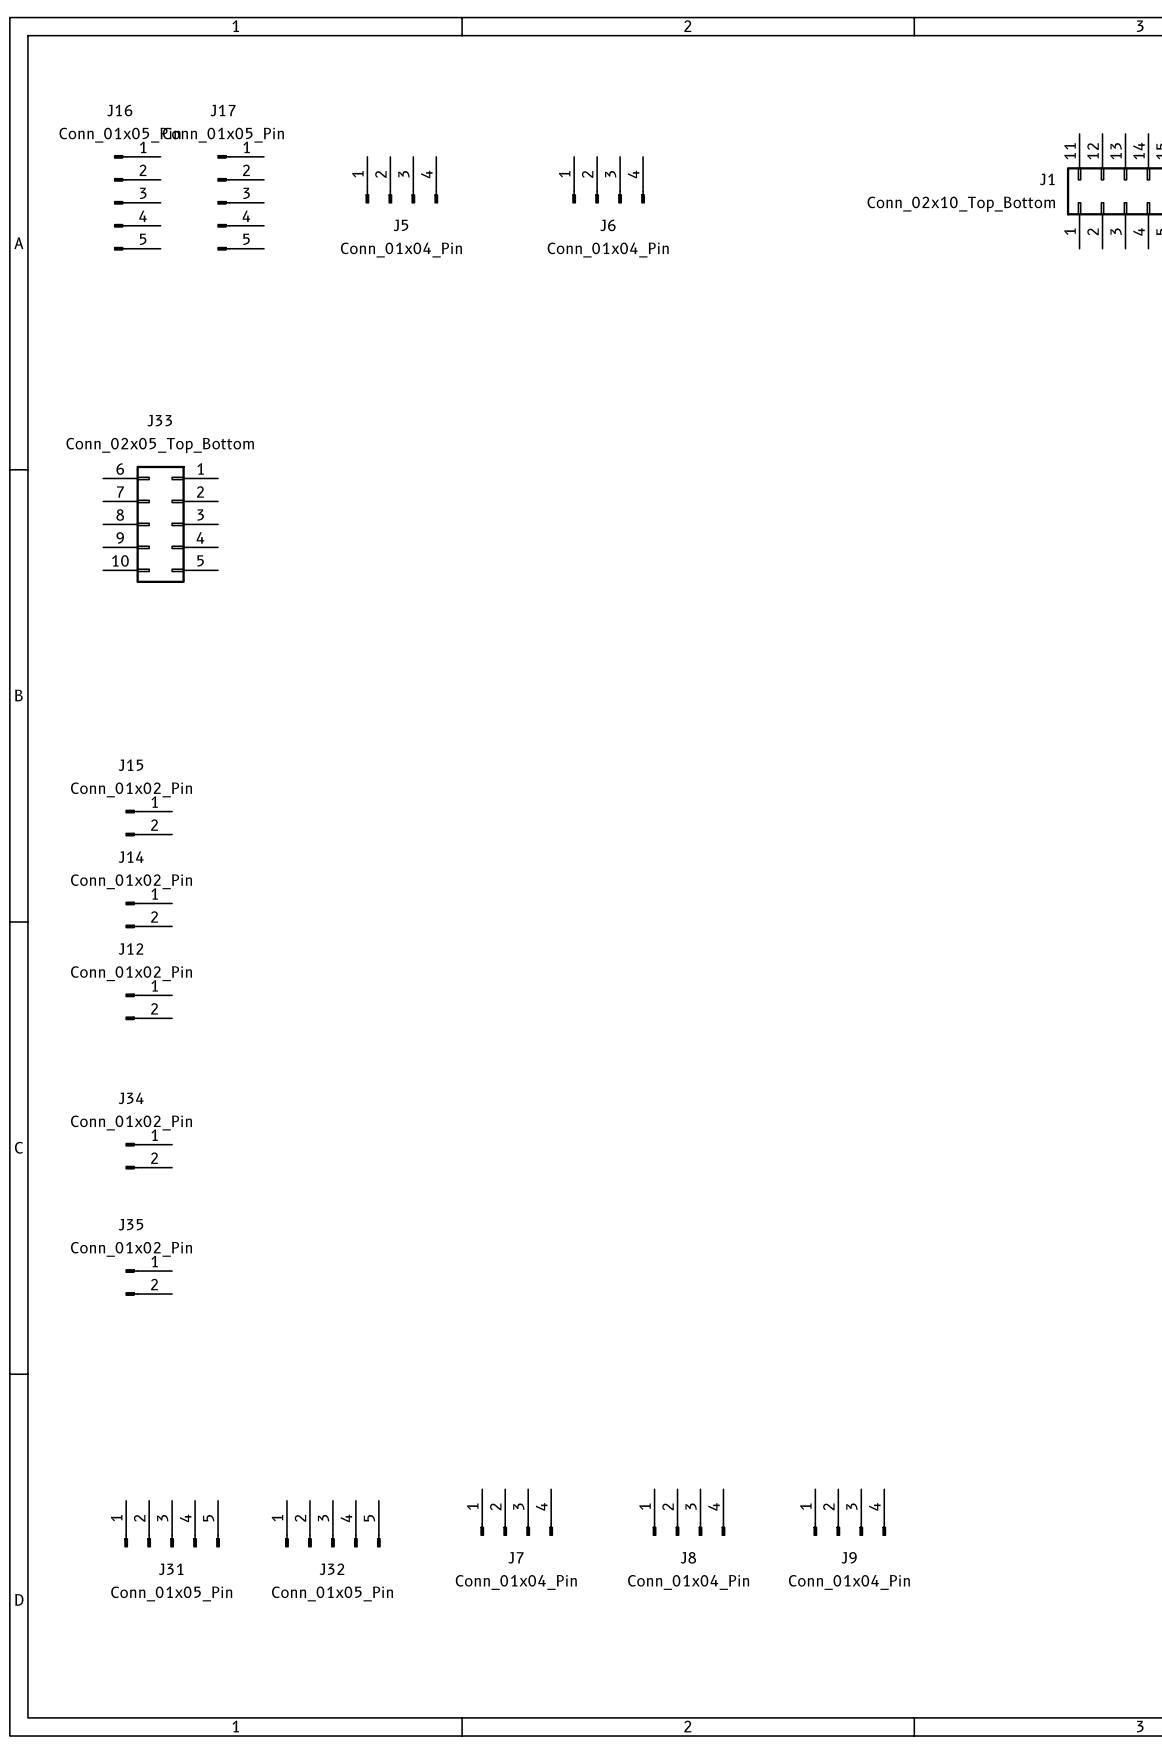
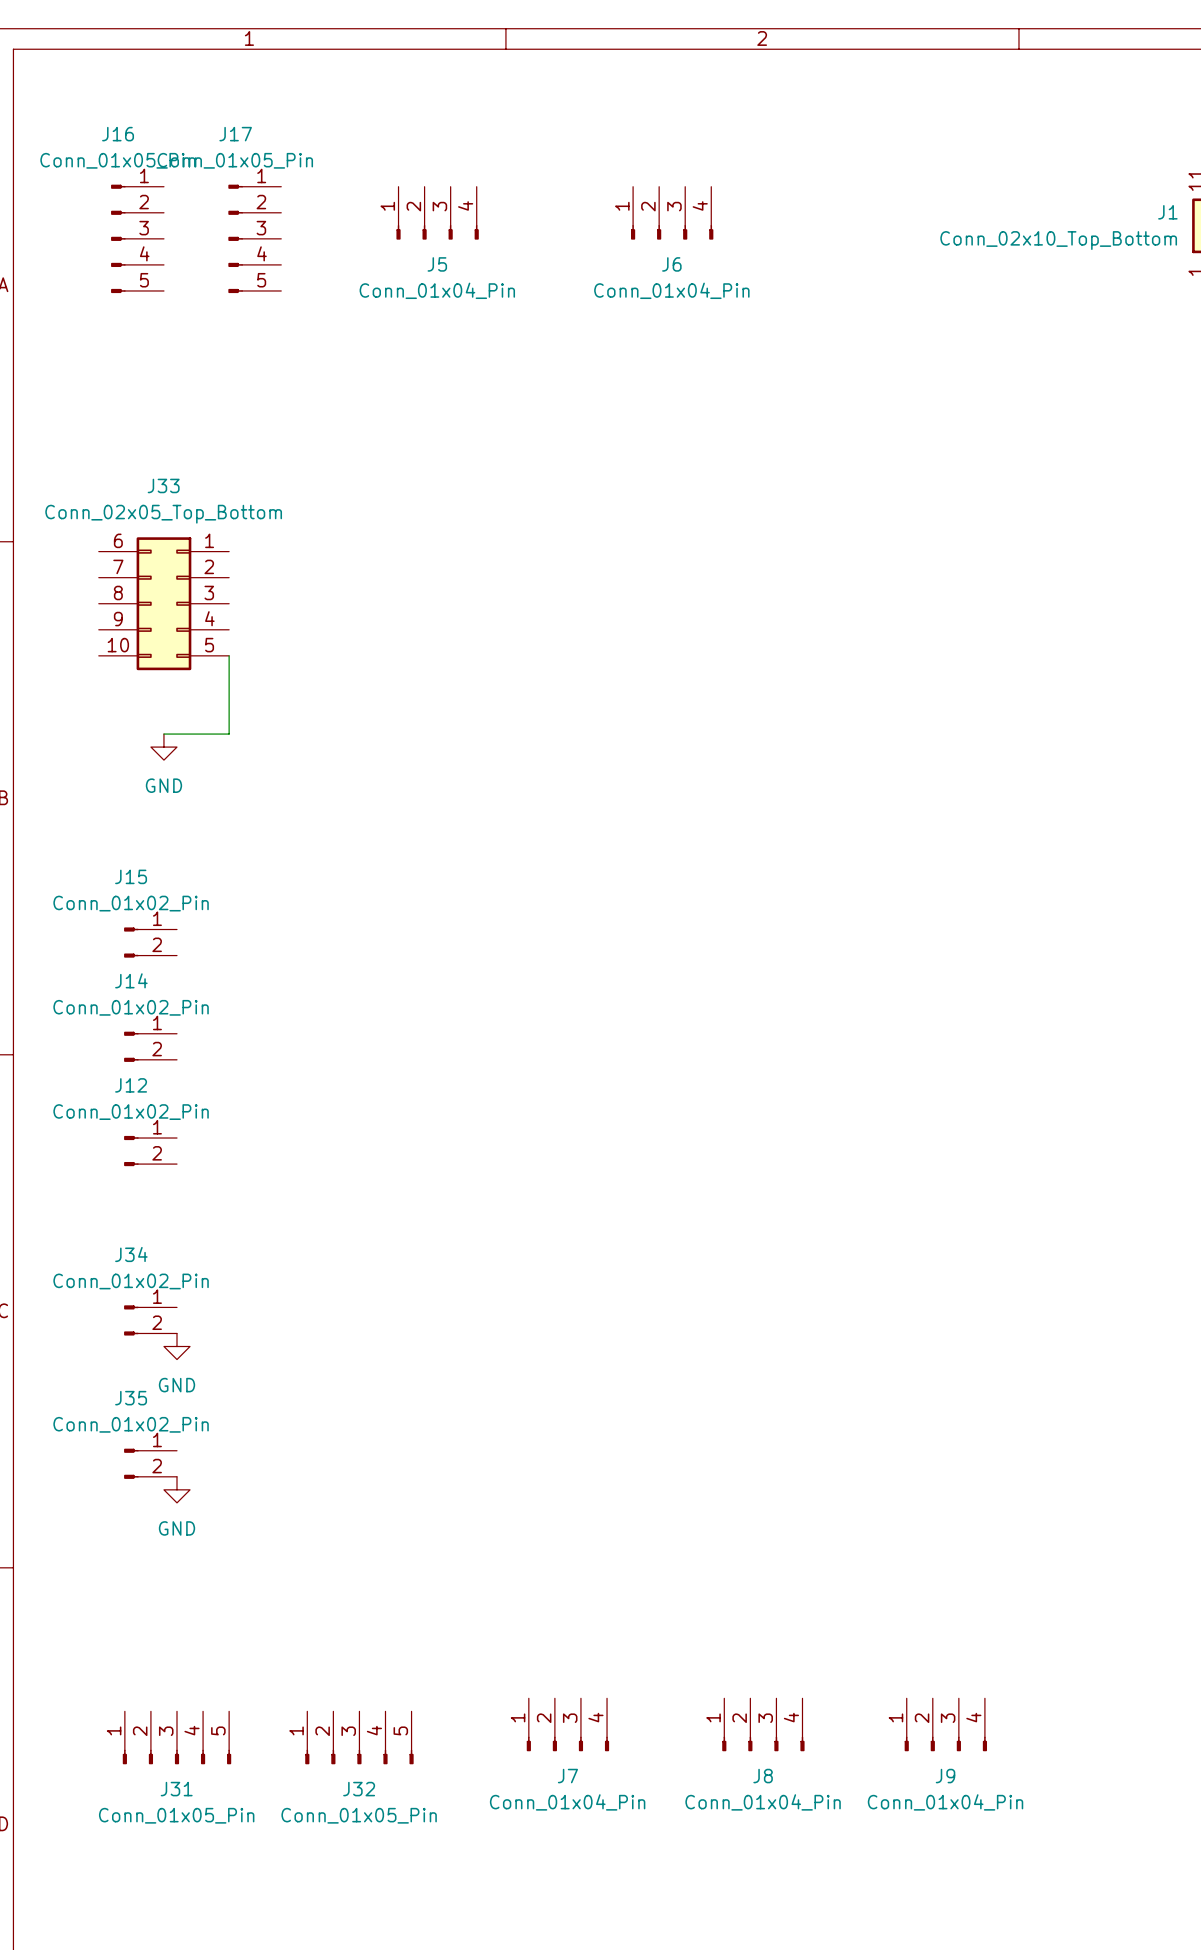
wire: none -> (229, 655) (229, 734) (163, 734)
power symbol: none -> GND (163, 747)
power symbol: none -> GND (176, 1346)
power symbol: none -> GND (176, 1489)

